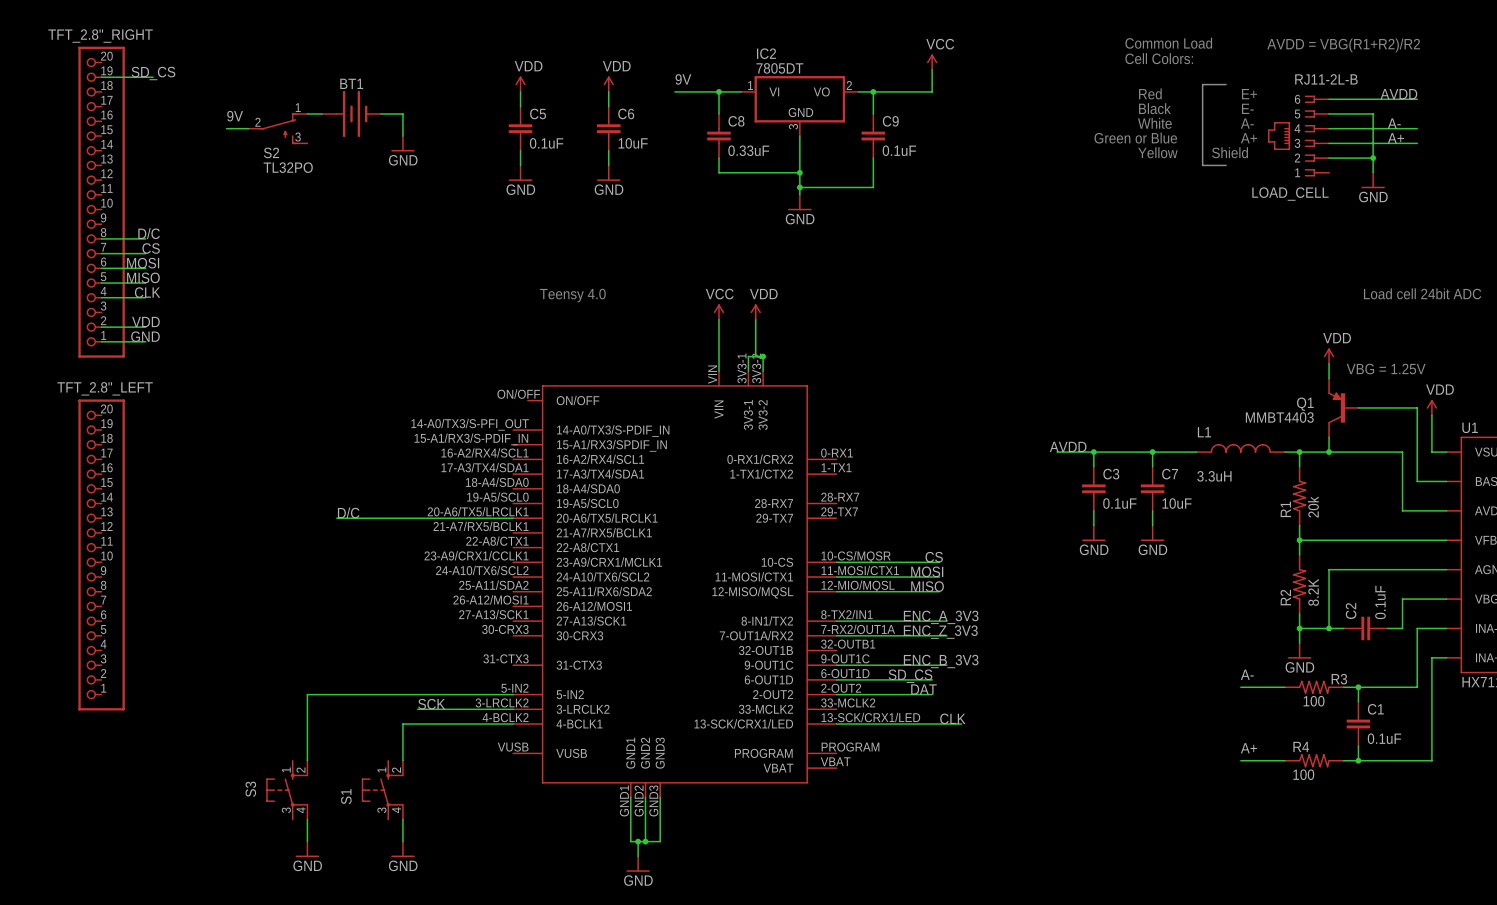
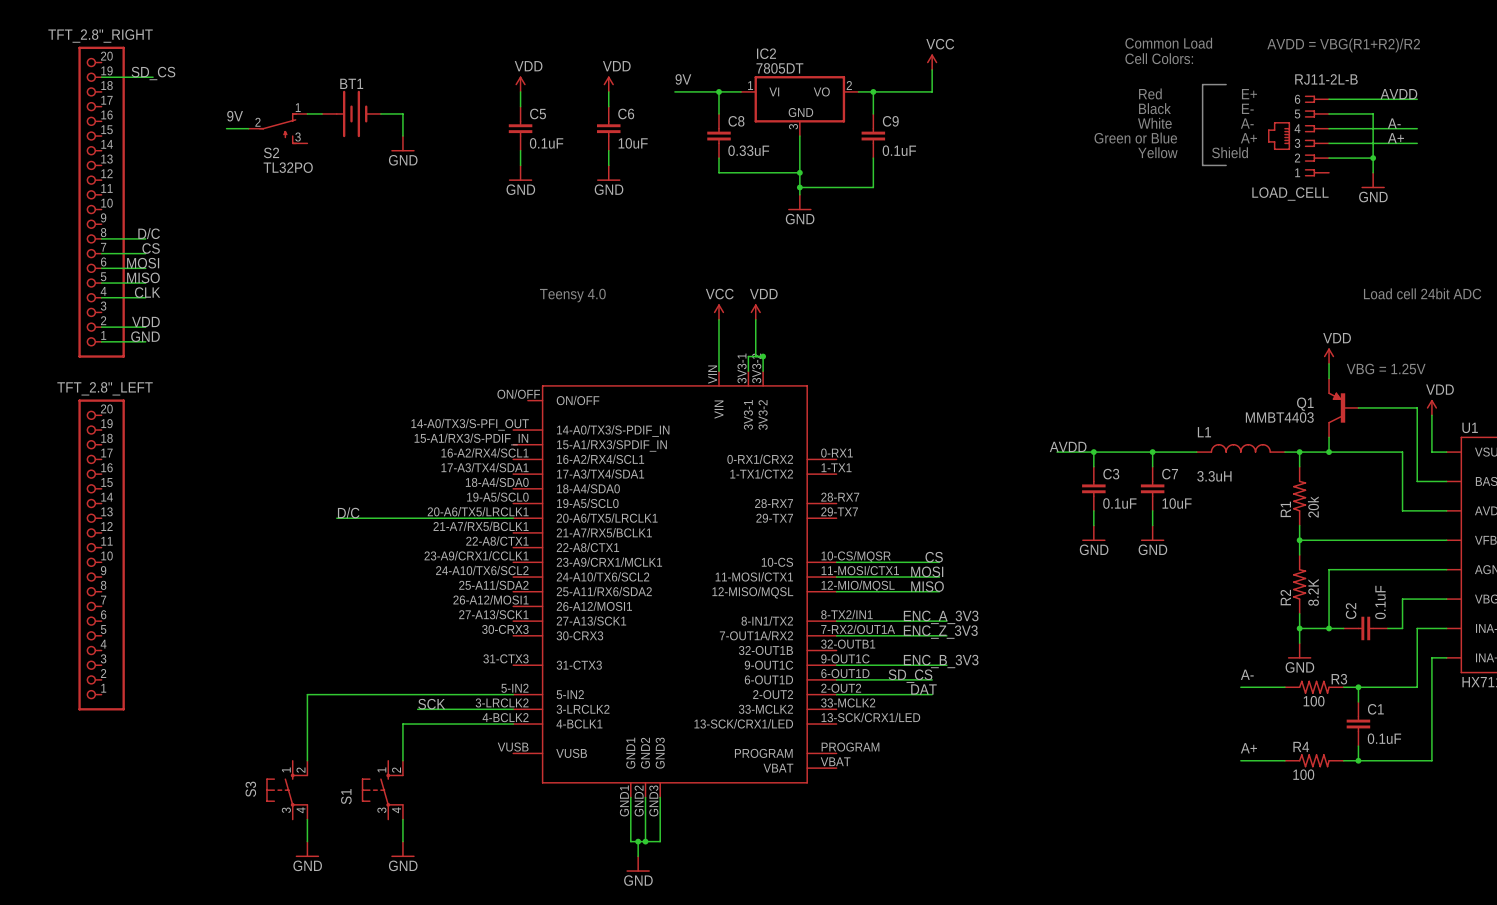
label: CLK (952, 718) -> none
wire: (836, 724) (961, 724) -> none

